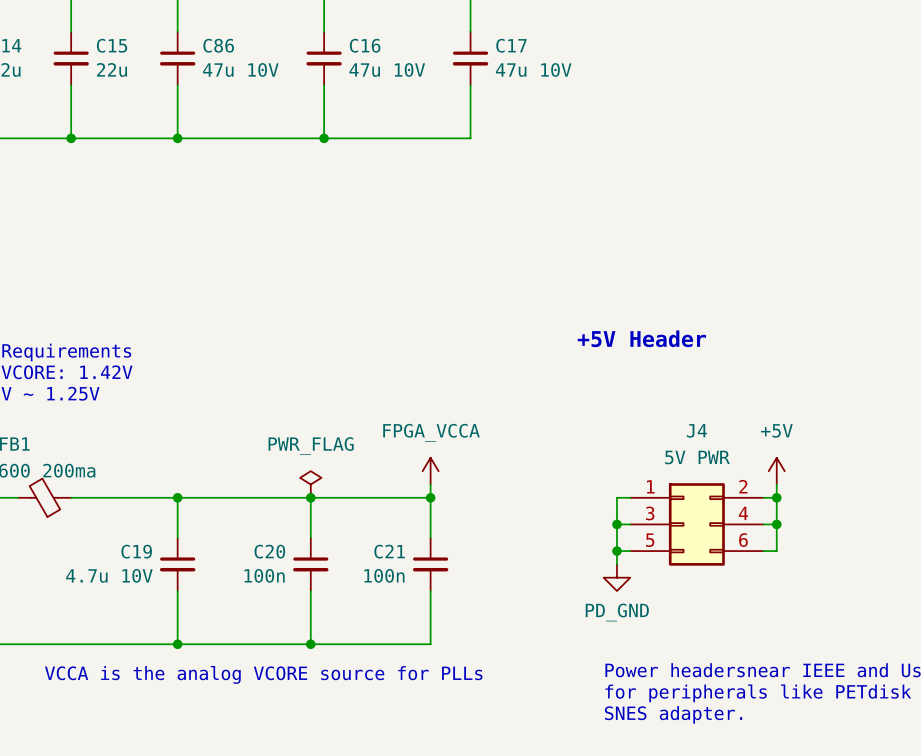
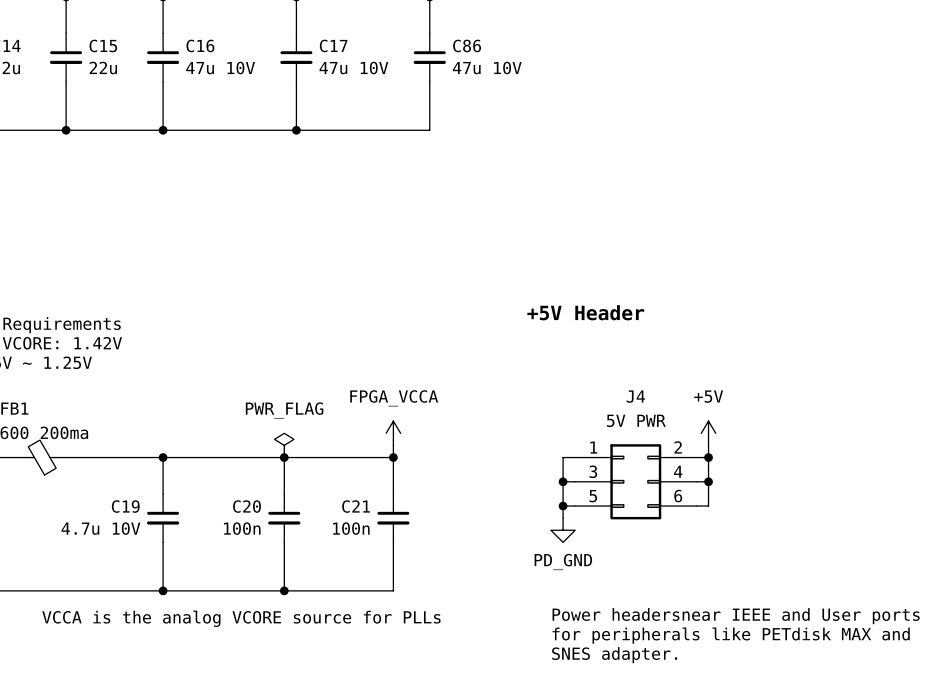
C86 name: C86 (218, 45) -> C16 (200, 45)
C16 name: C16 (365, 45) -> C17 (333, 45)
C17 name: C17 (511, 45) -> C86 (467, 45)

